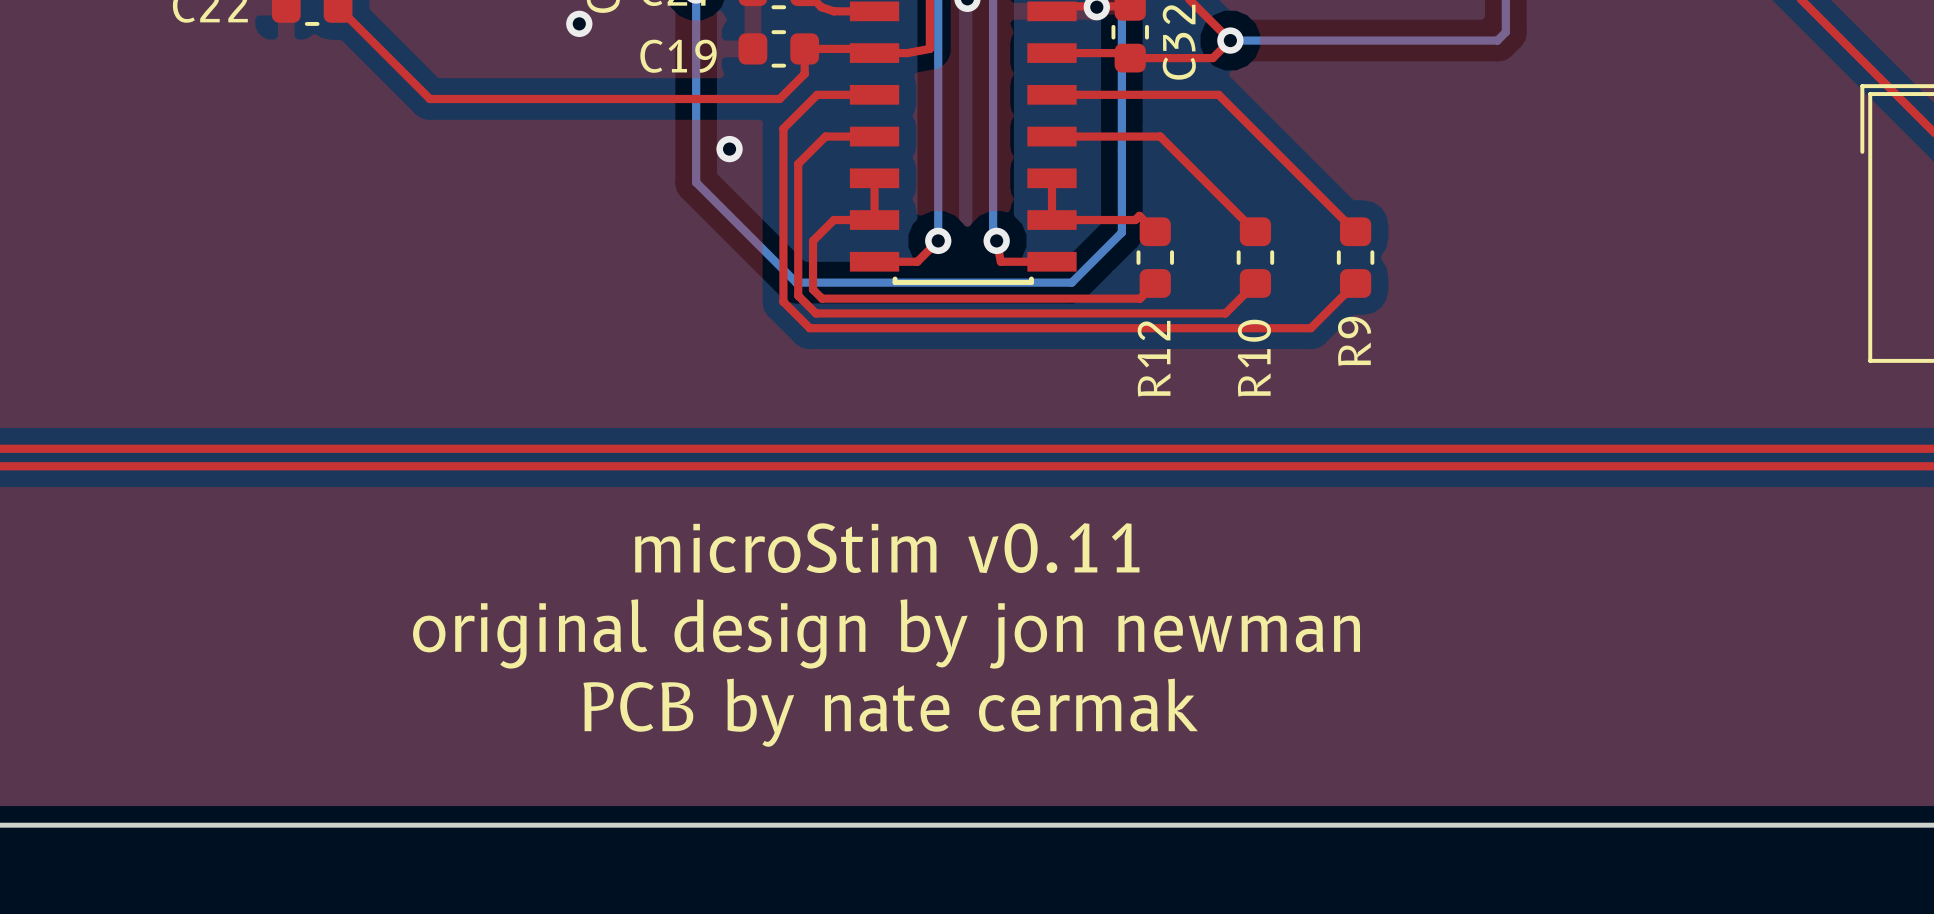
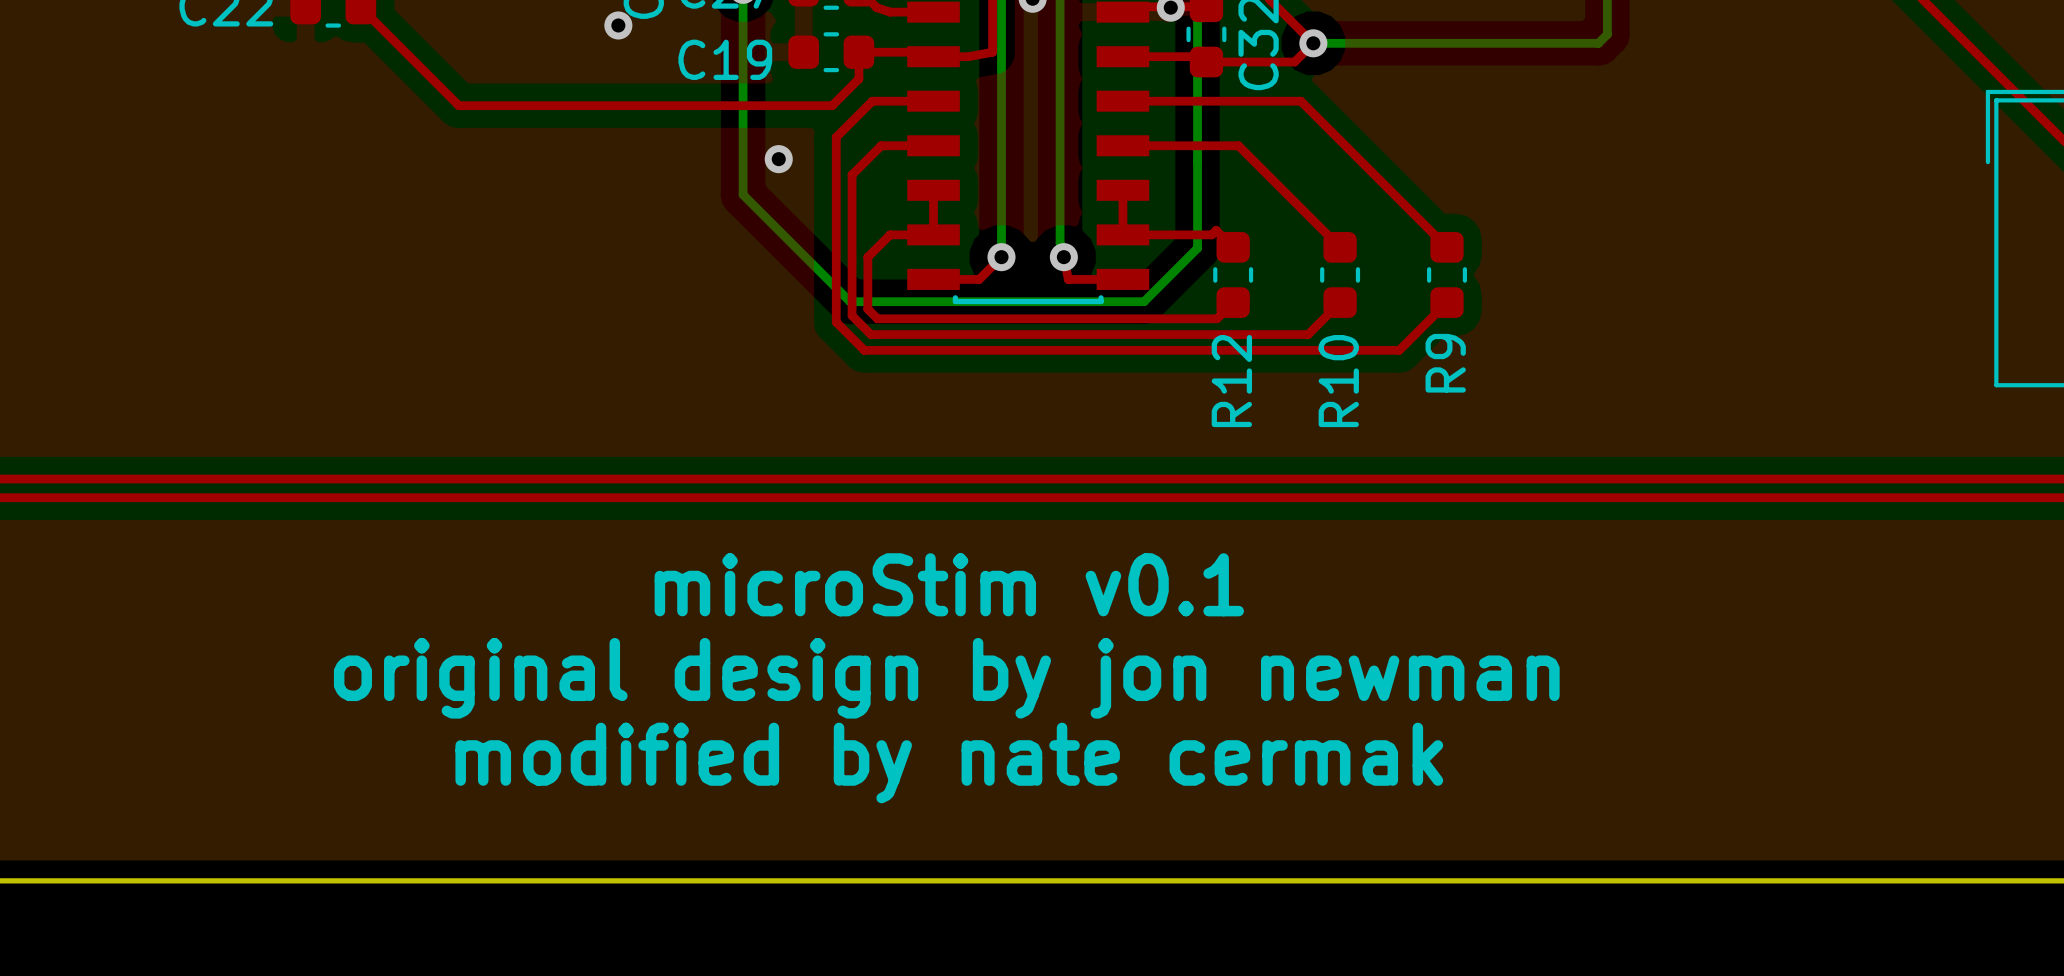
text: microStim v0.11 (887, 548) -> microStim v0.1 (949, 584)
text: PCB by nate cermak (890, 712) -> modified by nate cermak (949, 762)

